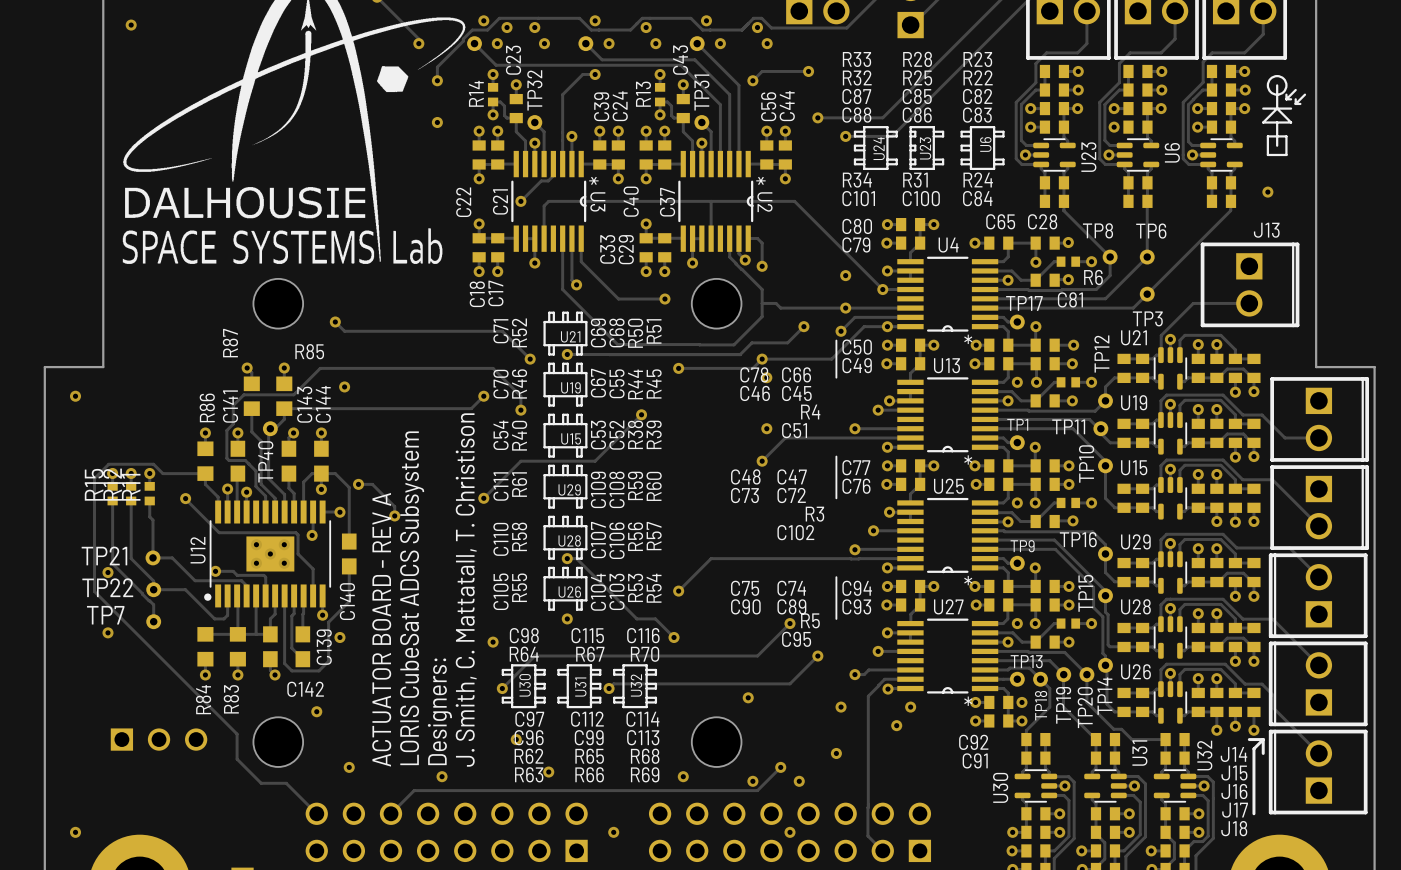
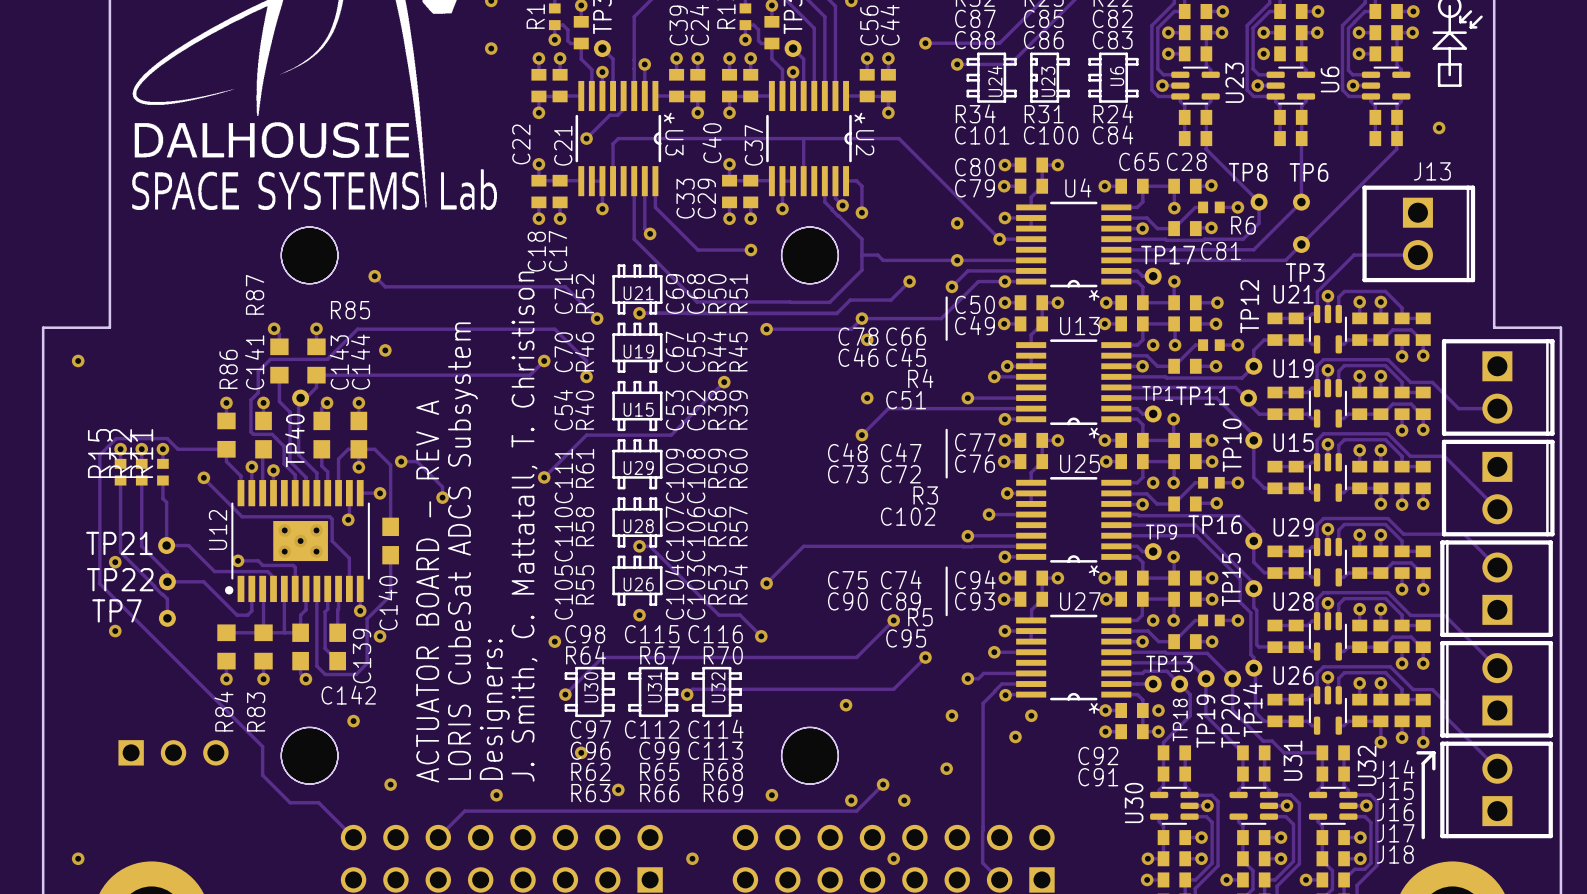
hole: none -> (309, 255)
hole: none -> (809, 255)
hole: none -> (309, 755)
hole: none -> (809, 755)

